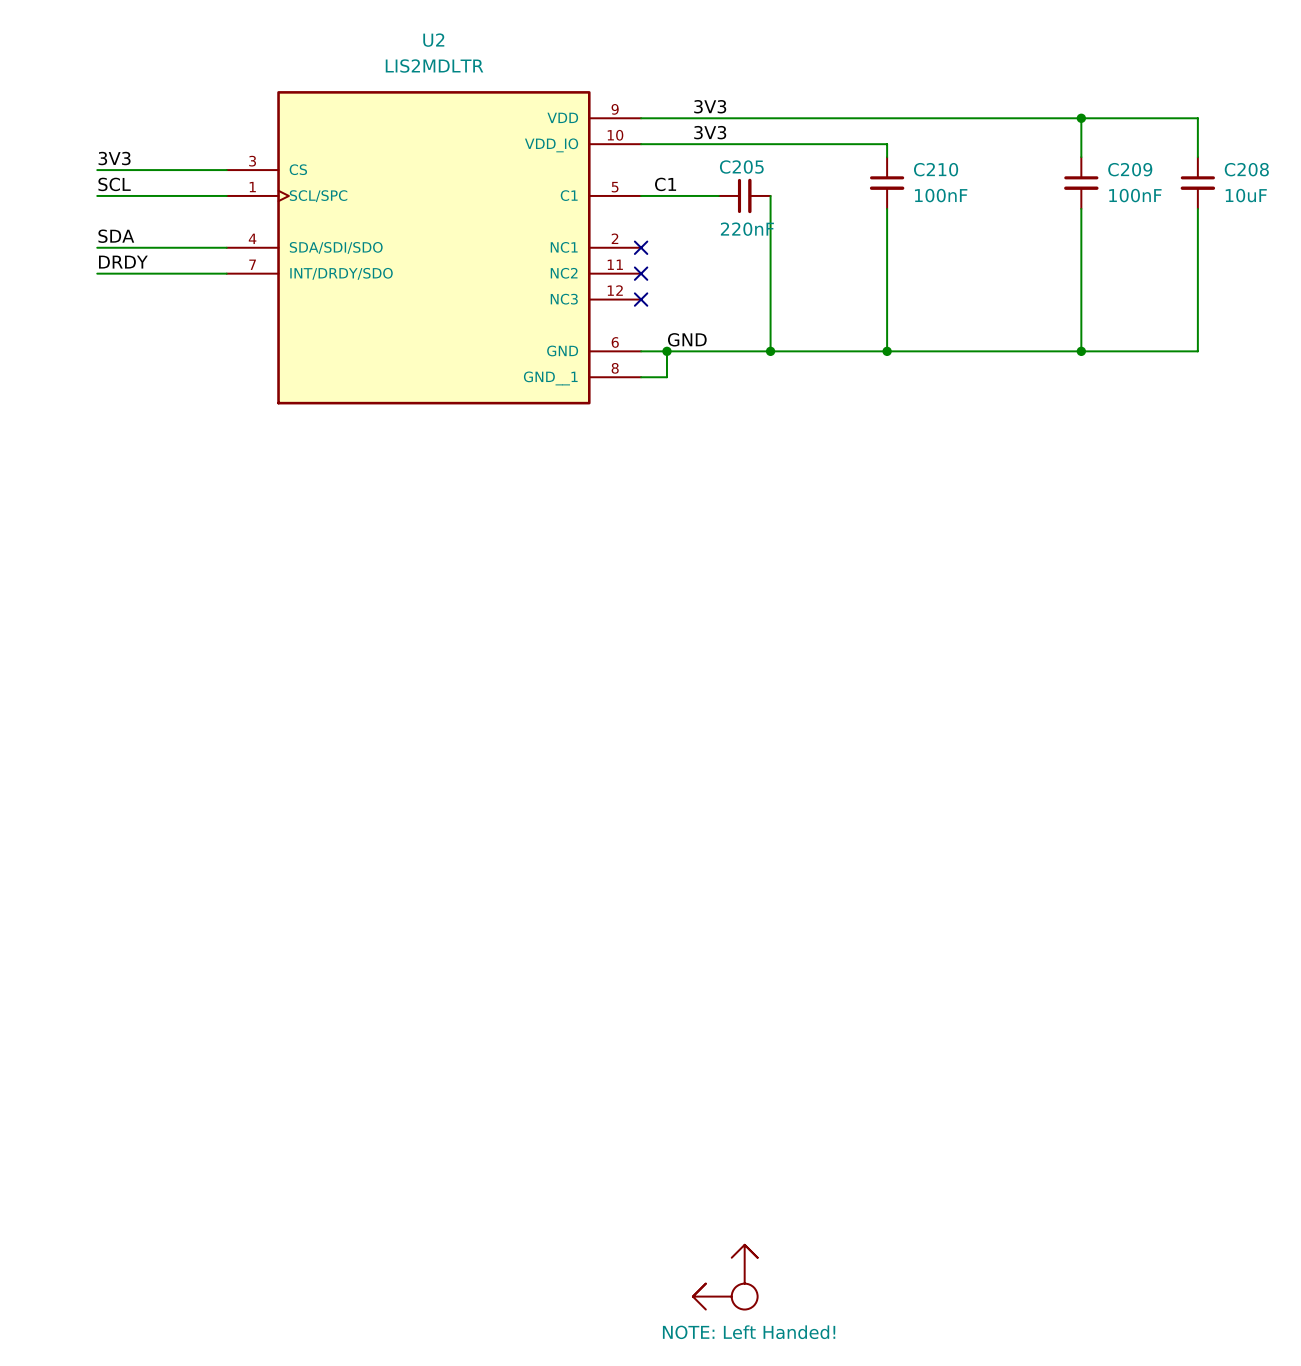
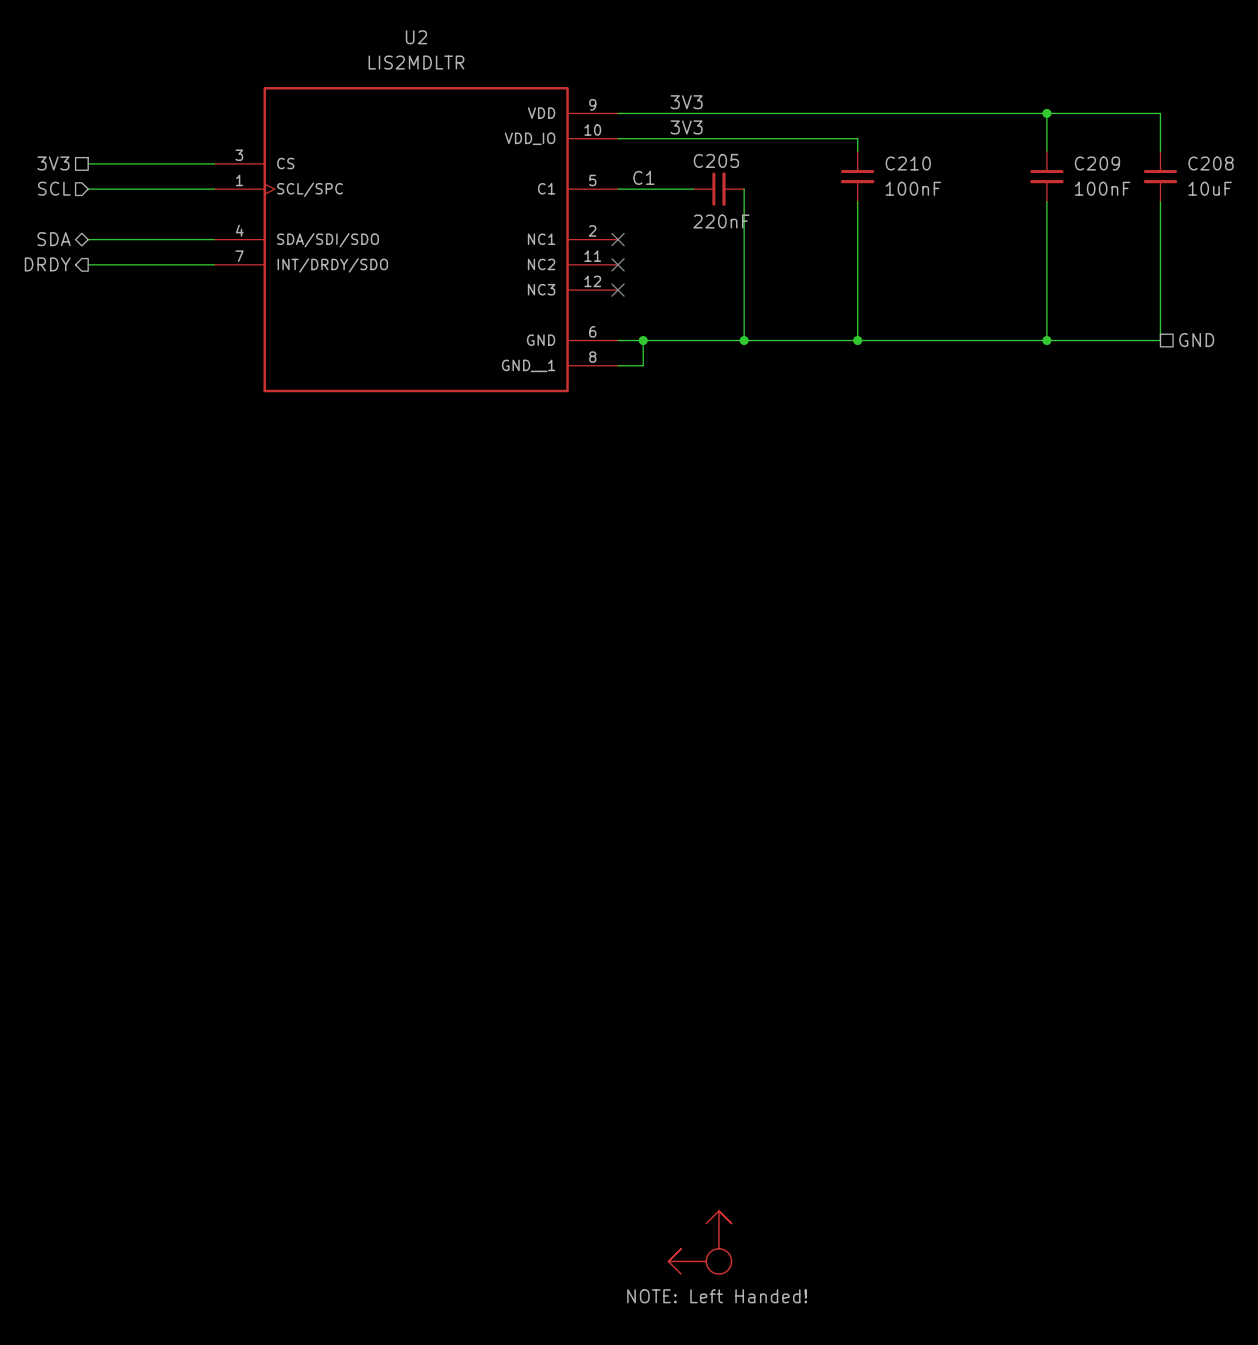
label: 3V3 (114, 158) -> none
hierarchical label: none -> 3V3 (53, 163)
label: SCL (114, 184) -> none
hierarchical label: none -> SCL (54, 188)
label: SDA (116, 236) -> none
hierarchical label: none -> SDA (54, 239)
label: DRDY (123, 262) -> none
hierarchical label: none -> DRDY (47, 264)
label: GND (687, 339) -> none
hierarchical label: none -> GND (1196, 340)

